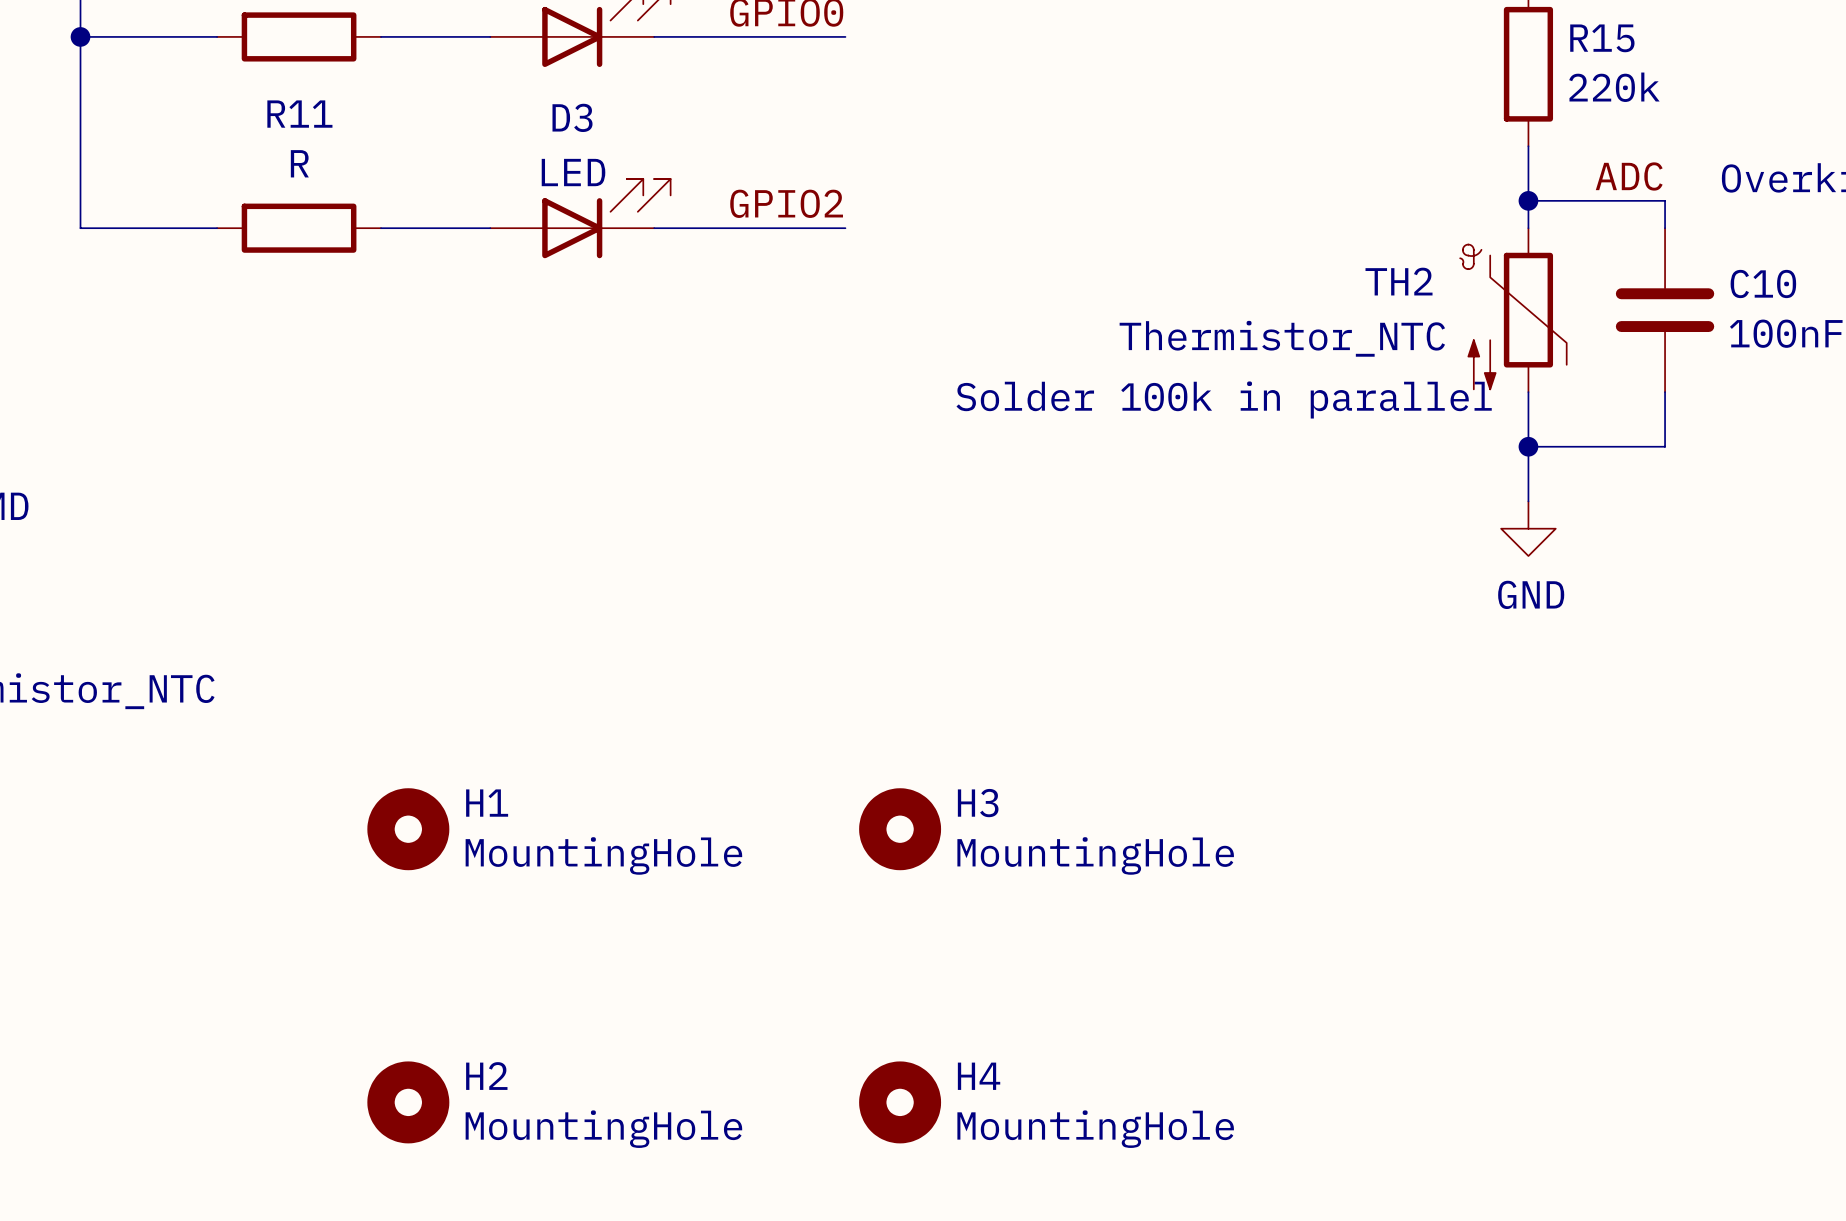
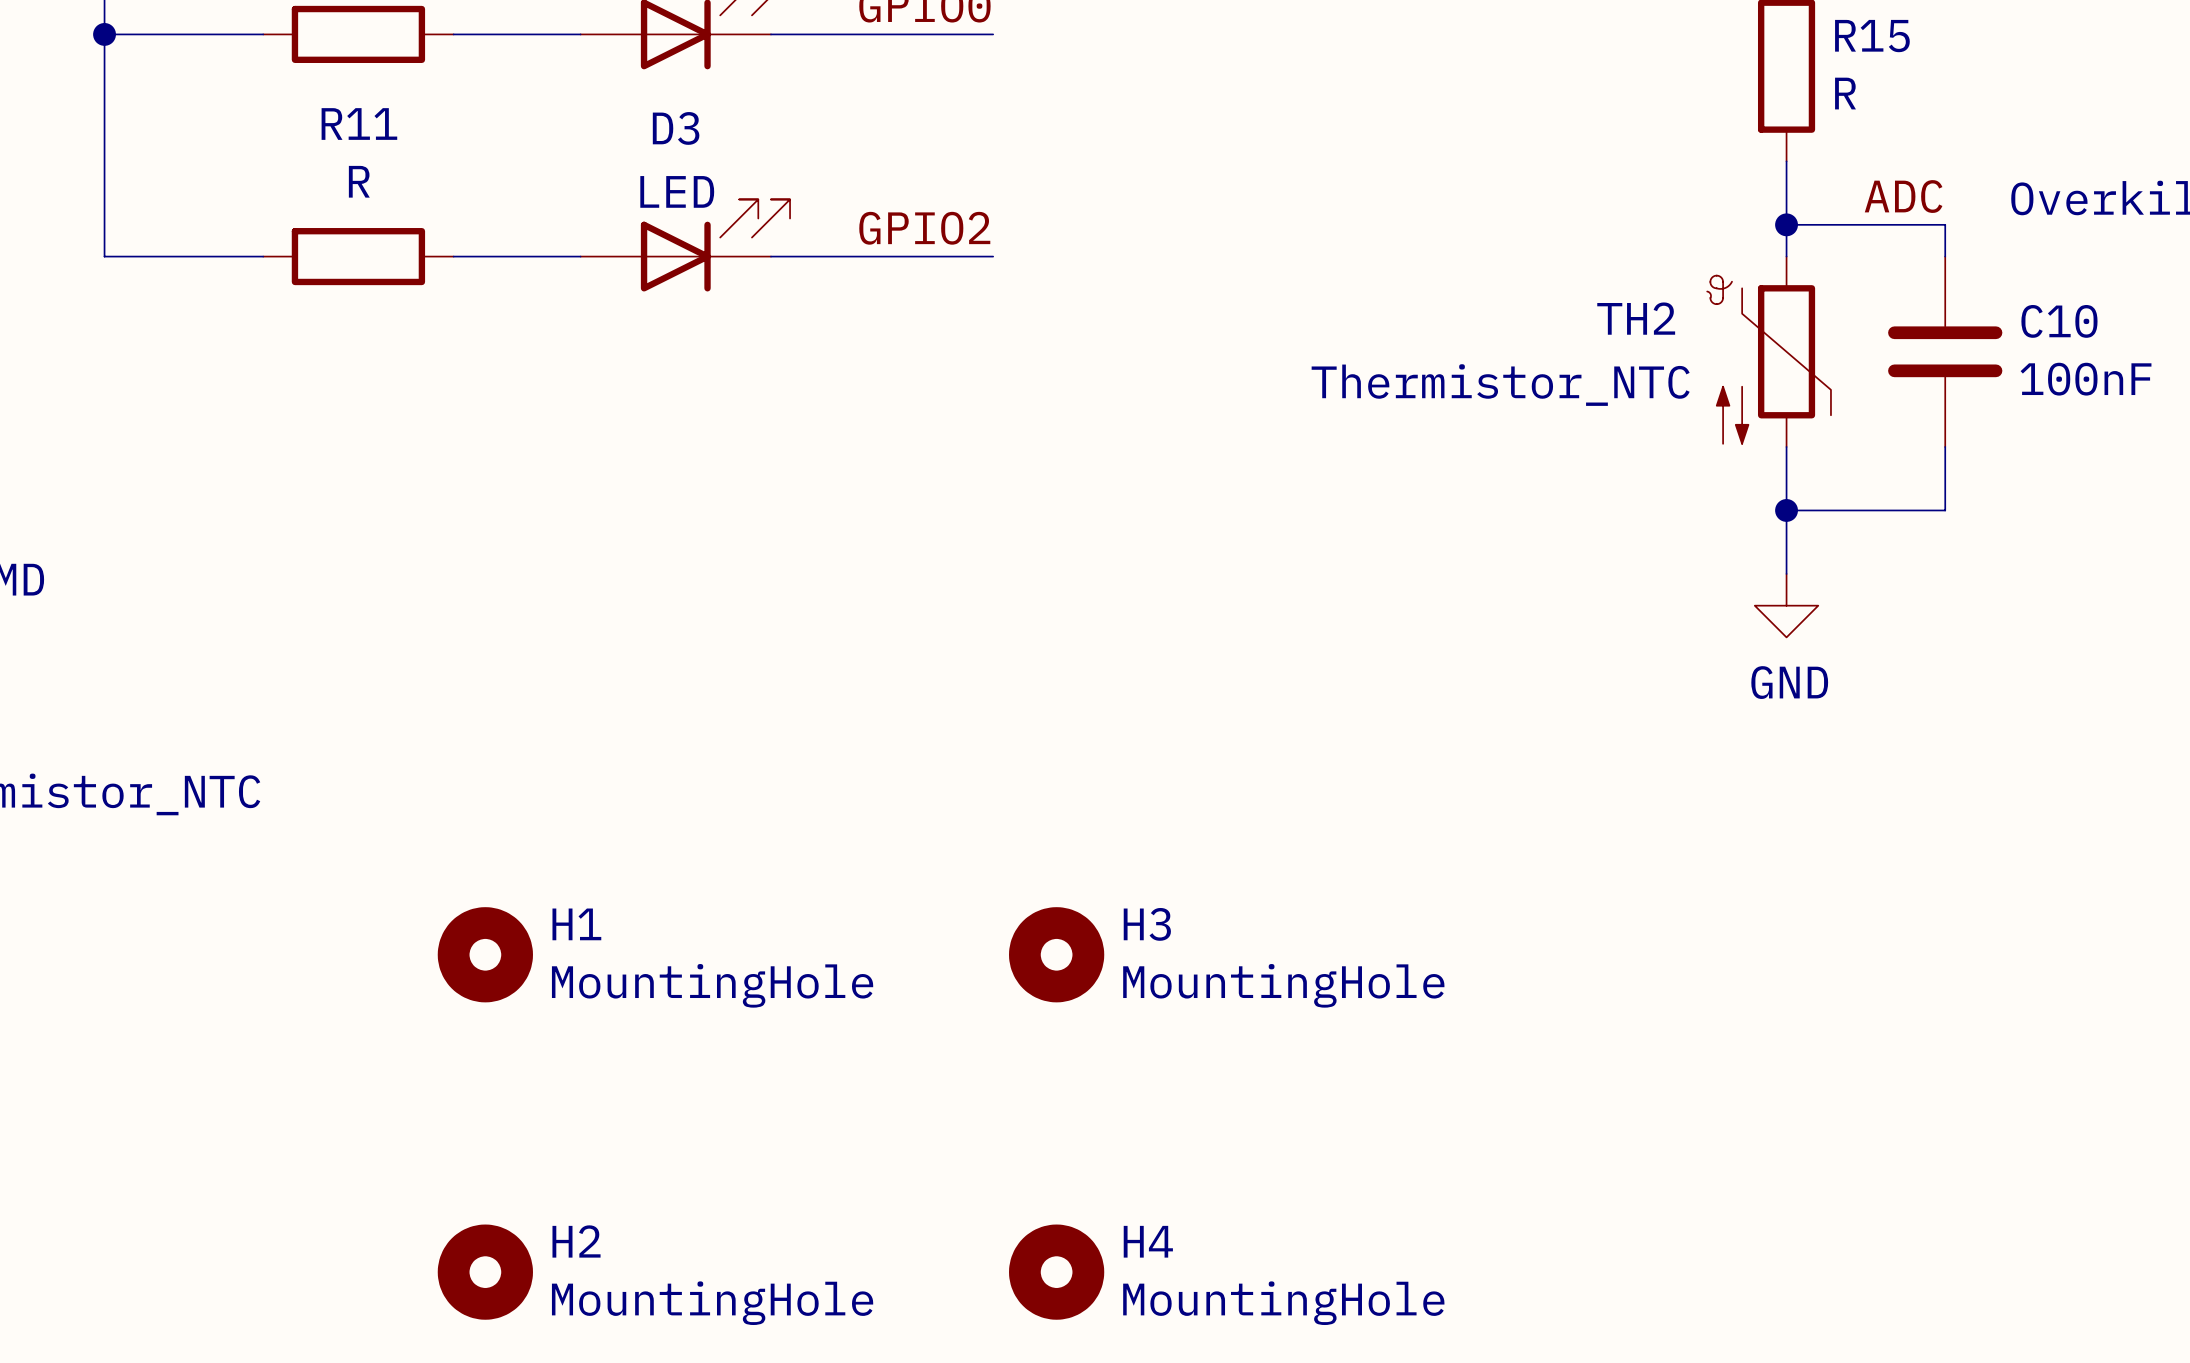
R15 value: 220k (1614, 87) -> R (1845, 93)
text: Solder 100k in parallel (1224, 399) -> none

